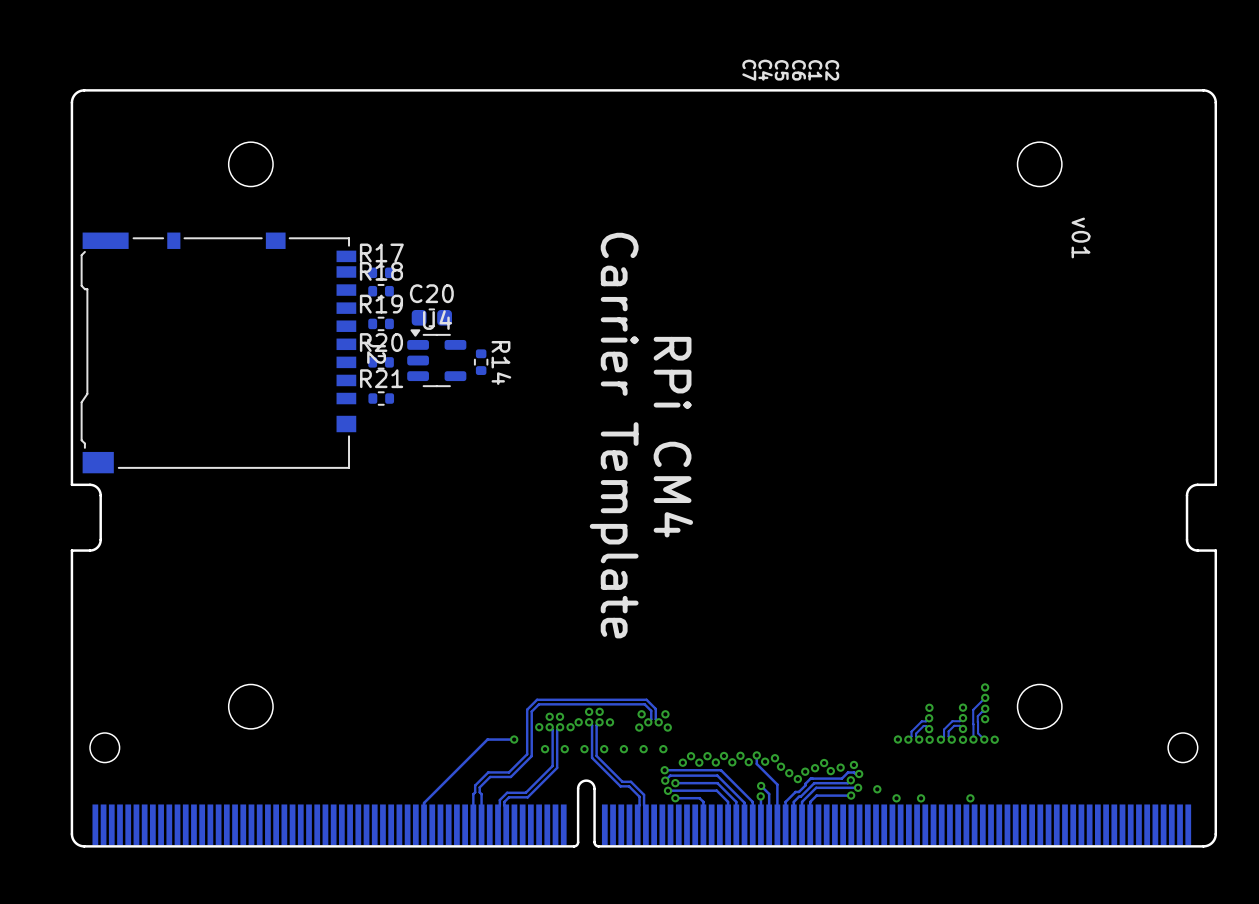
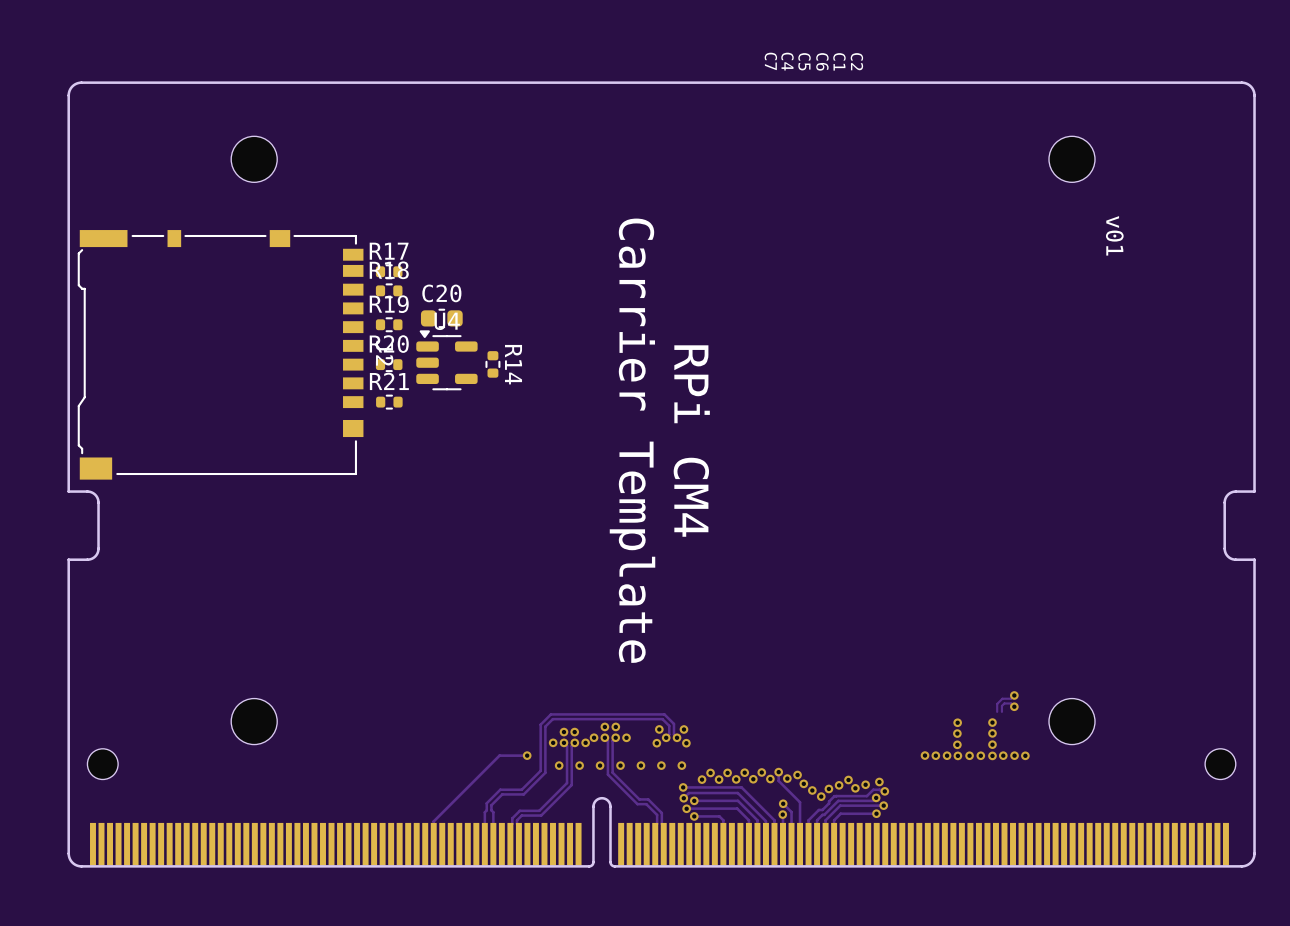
track: none -> (1014, 695) (1011, 698) (1002, 698) (997, 703) (997, 711)
via: none -> (1014, 695)
via: (985, 687) -> none
track: none -> (1014, 706) (1011, 703) (1004, 703) (1001, 705) (1001, 711)
via: none -> (1014, 706)
track: (985, 697) (973, 709) (973, 739) -> none
via: (985, 697) -> none
track: (985, 708) (985, 711) (982, 711) (977, 716) (978, 733) (984, 739) -> none
via: (985, 708) -> none
track: (929, 718) (926, 721) (921, 721) (911, 731) (911, 736) (908, 739) -> none
track: (963, 718) (959, 721) (952, 721) (944, 729) (944, 736) (940, 739) -> none
via: (985, 719) -> none
track: (963, 728) (959, 725) (954, 725) (948, 731) (948, 736) (951, 739) -> none
track: (929, 729) (923, 725) (916, 733) (919, 739) -> none
via: (877, 789) -> none
via: (896, 798) -> none
via: (921, 798) -> none
via: (970, 798) -> none

